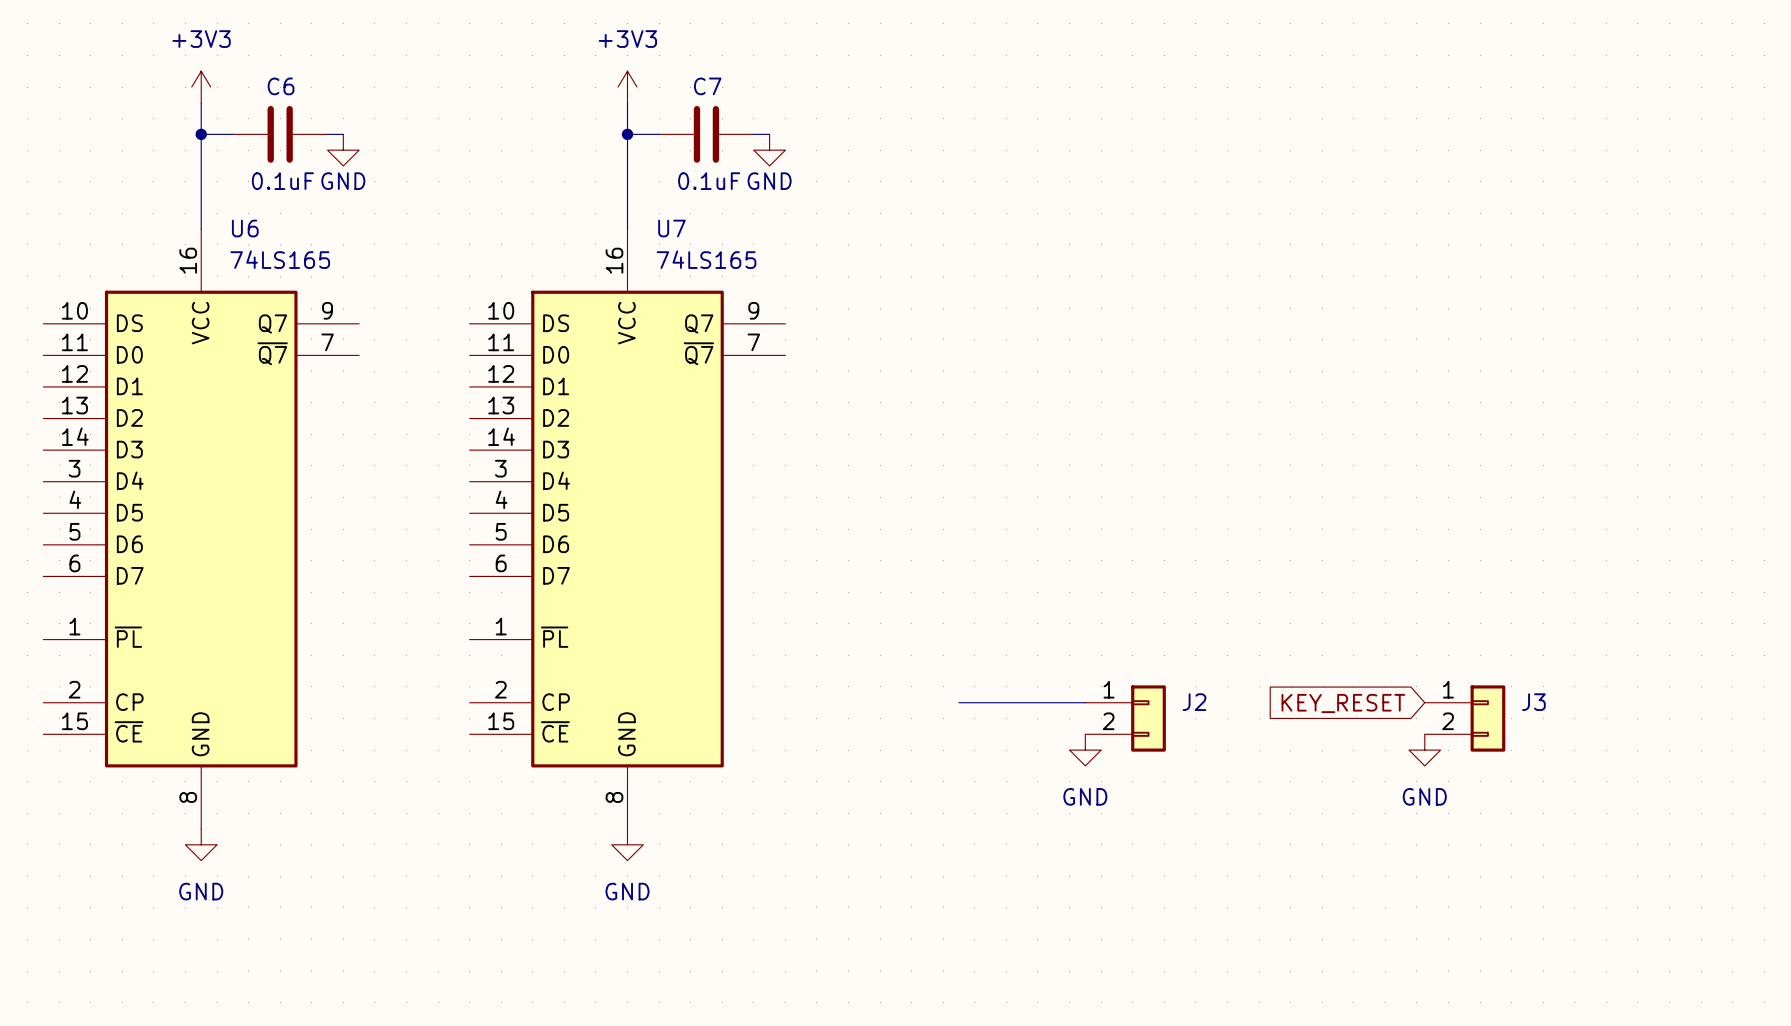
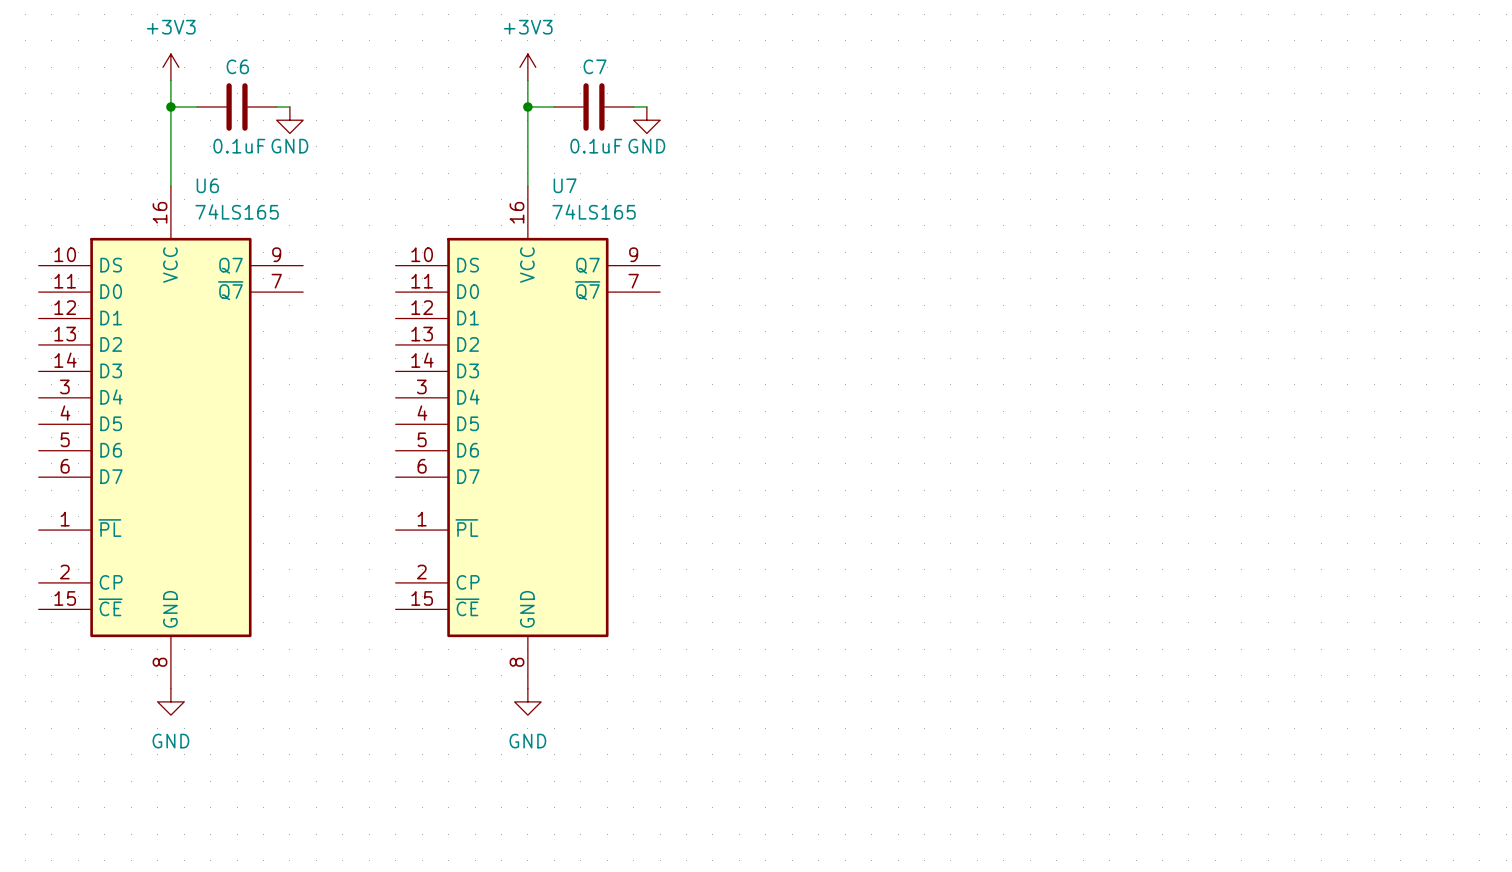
wire: (959, 702) (1085, 702) -> none
global label: KEY_RESET (1343, 703) -> none
J2: (1125, 718) -> none
J3: (1465, 718) -> none
power symbol: GND (1085, 750) -> none
power symbol: GND (1424, 750) -> none

